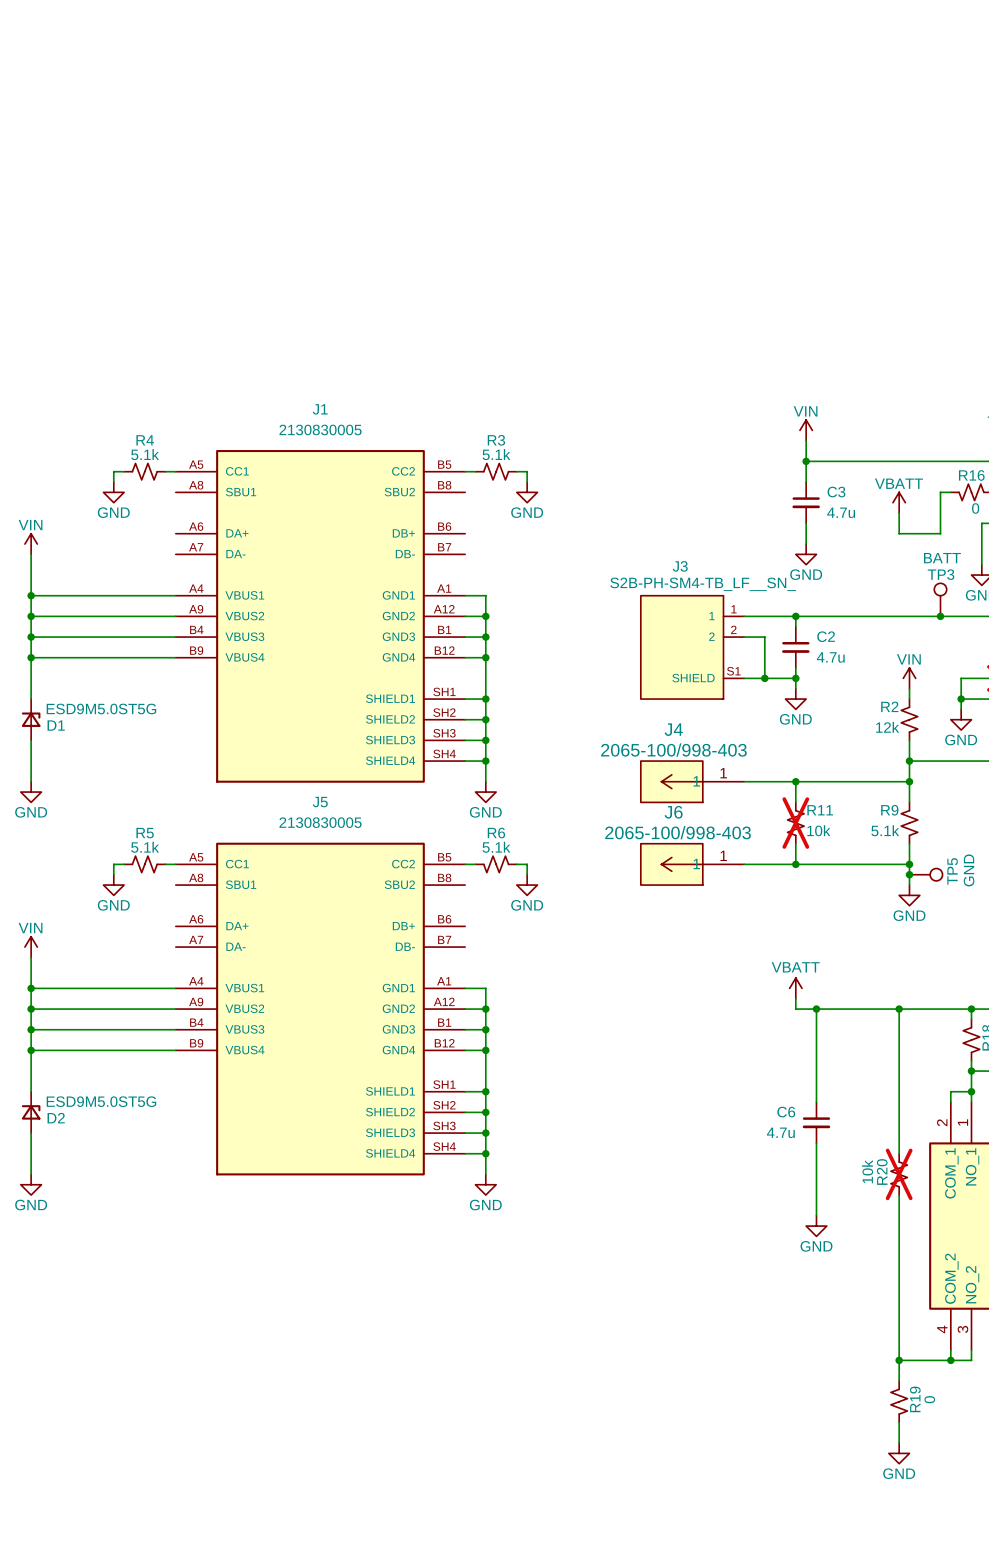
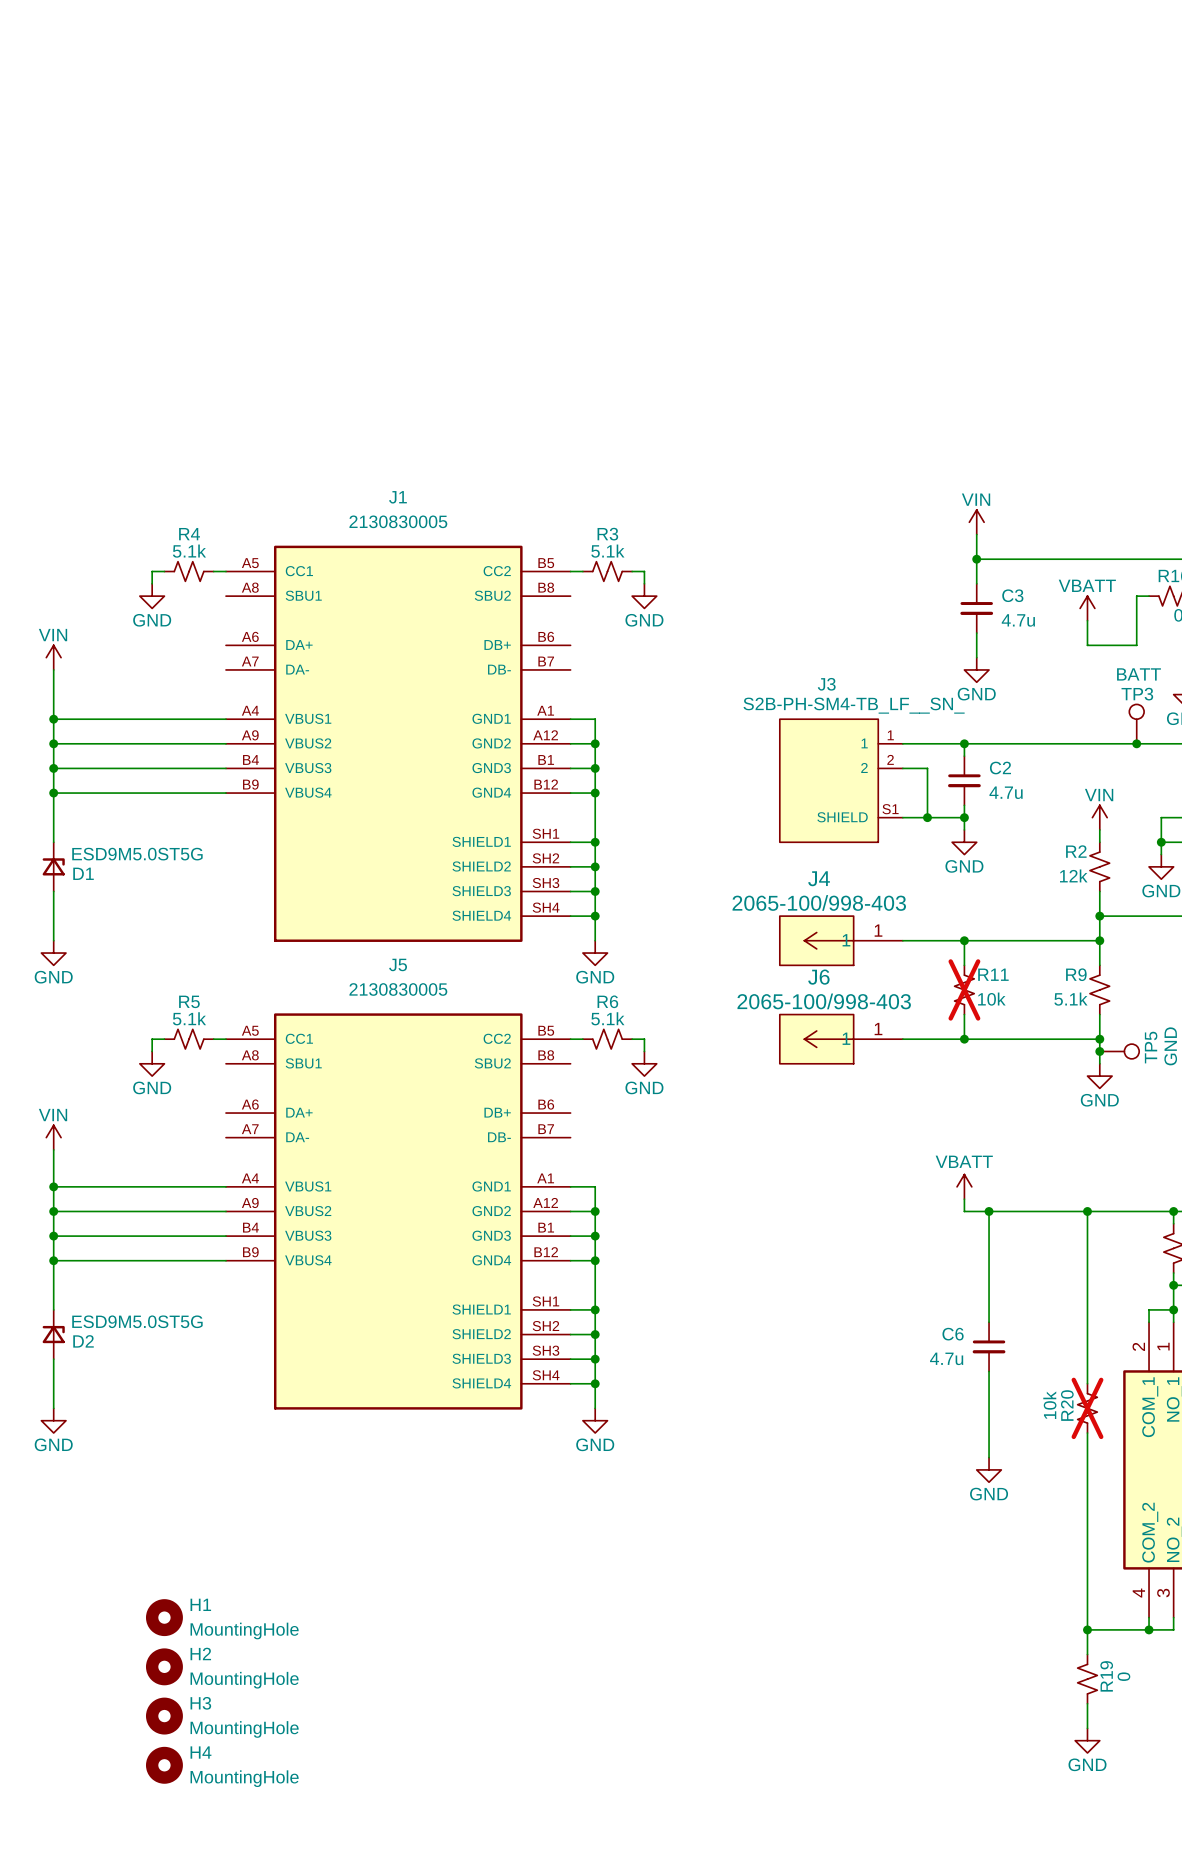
H1: none -> MountingHole (164, 1617)
H2: none -> MountingHole (164, 1666)
H3: none -> MountingHole (164, 1716)
H4: none -> MountingHole (164, 1765)

